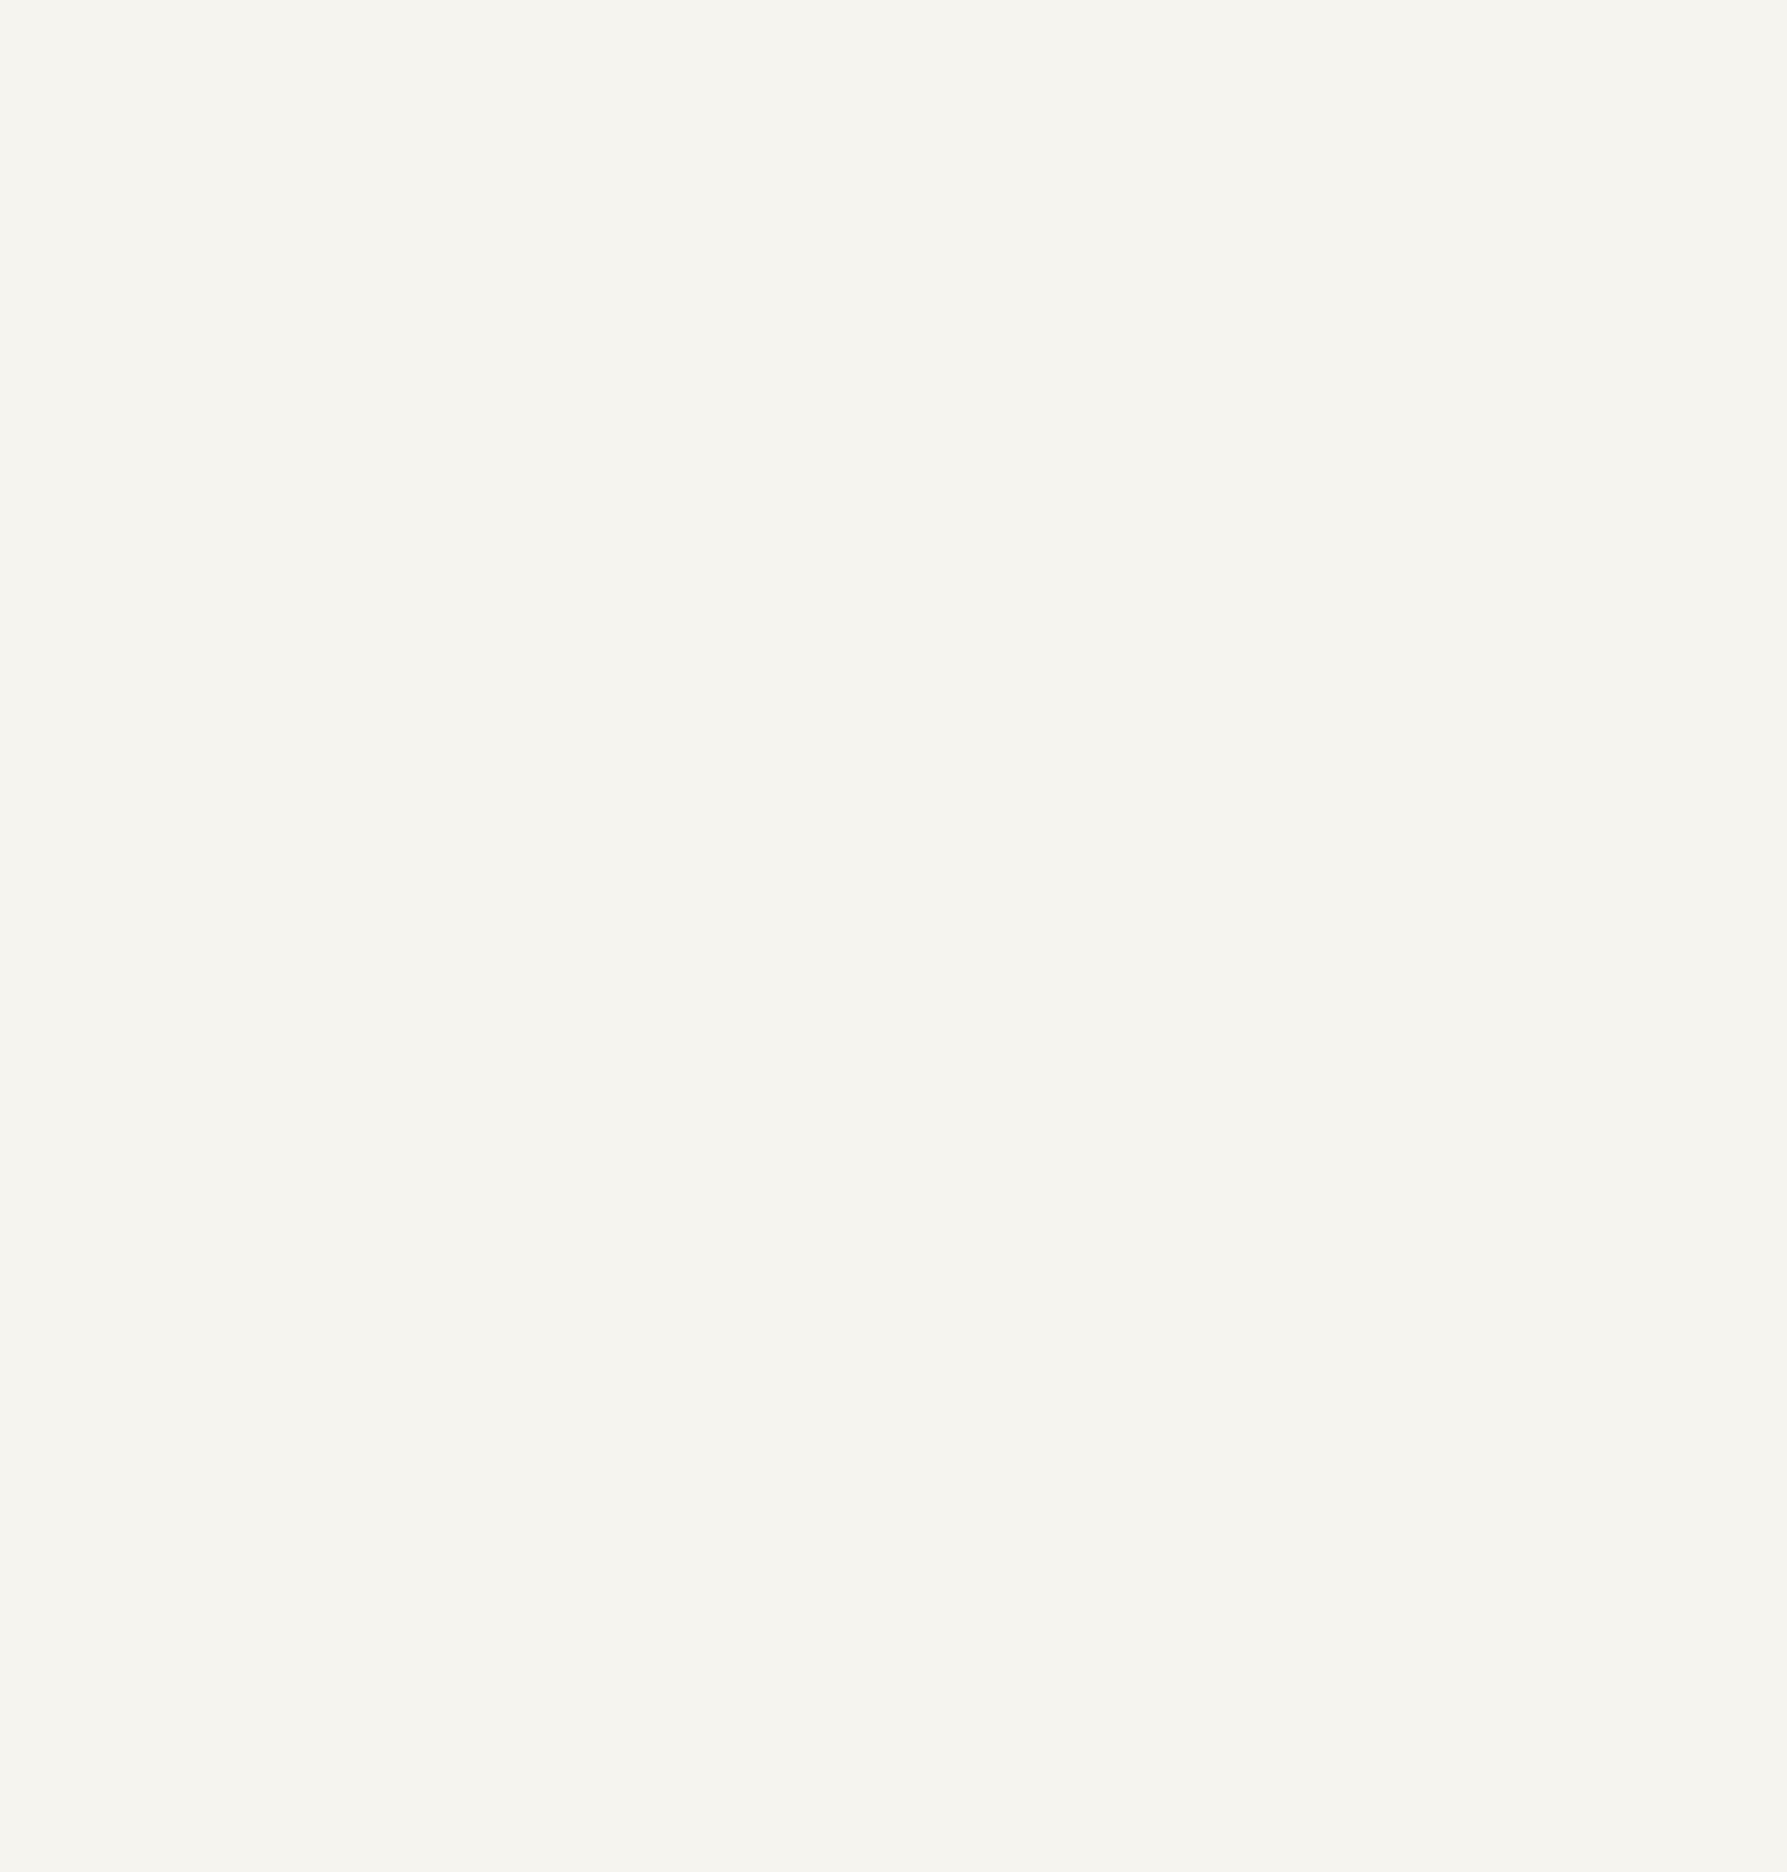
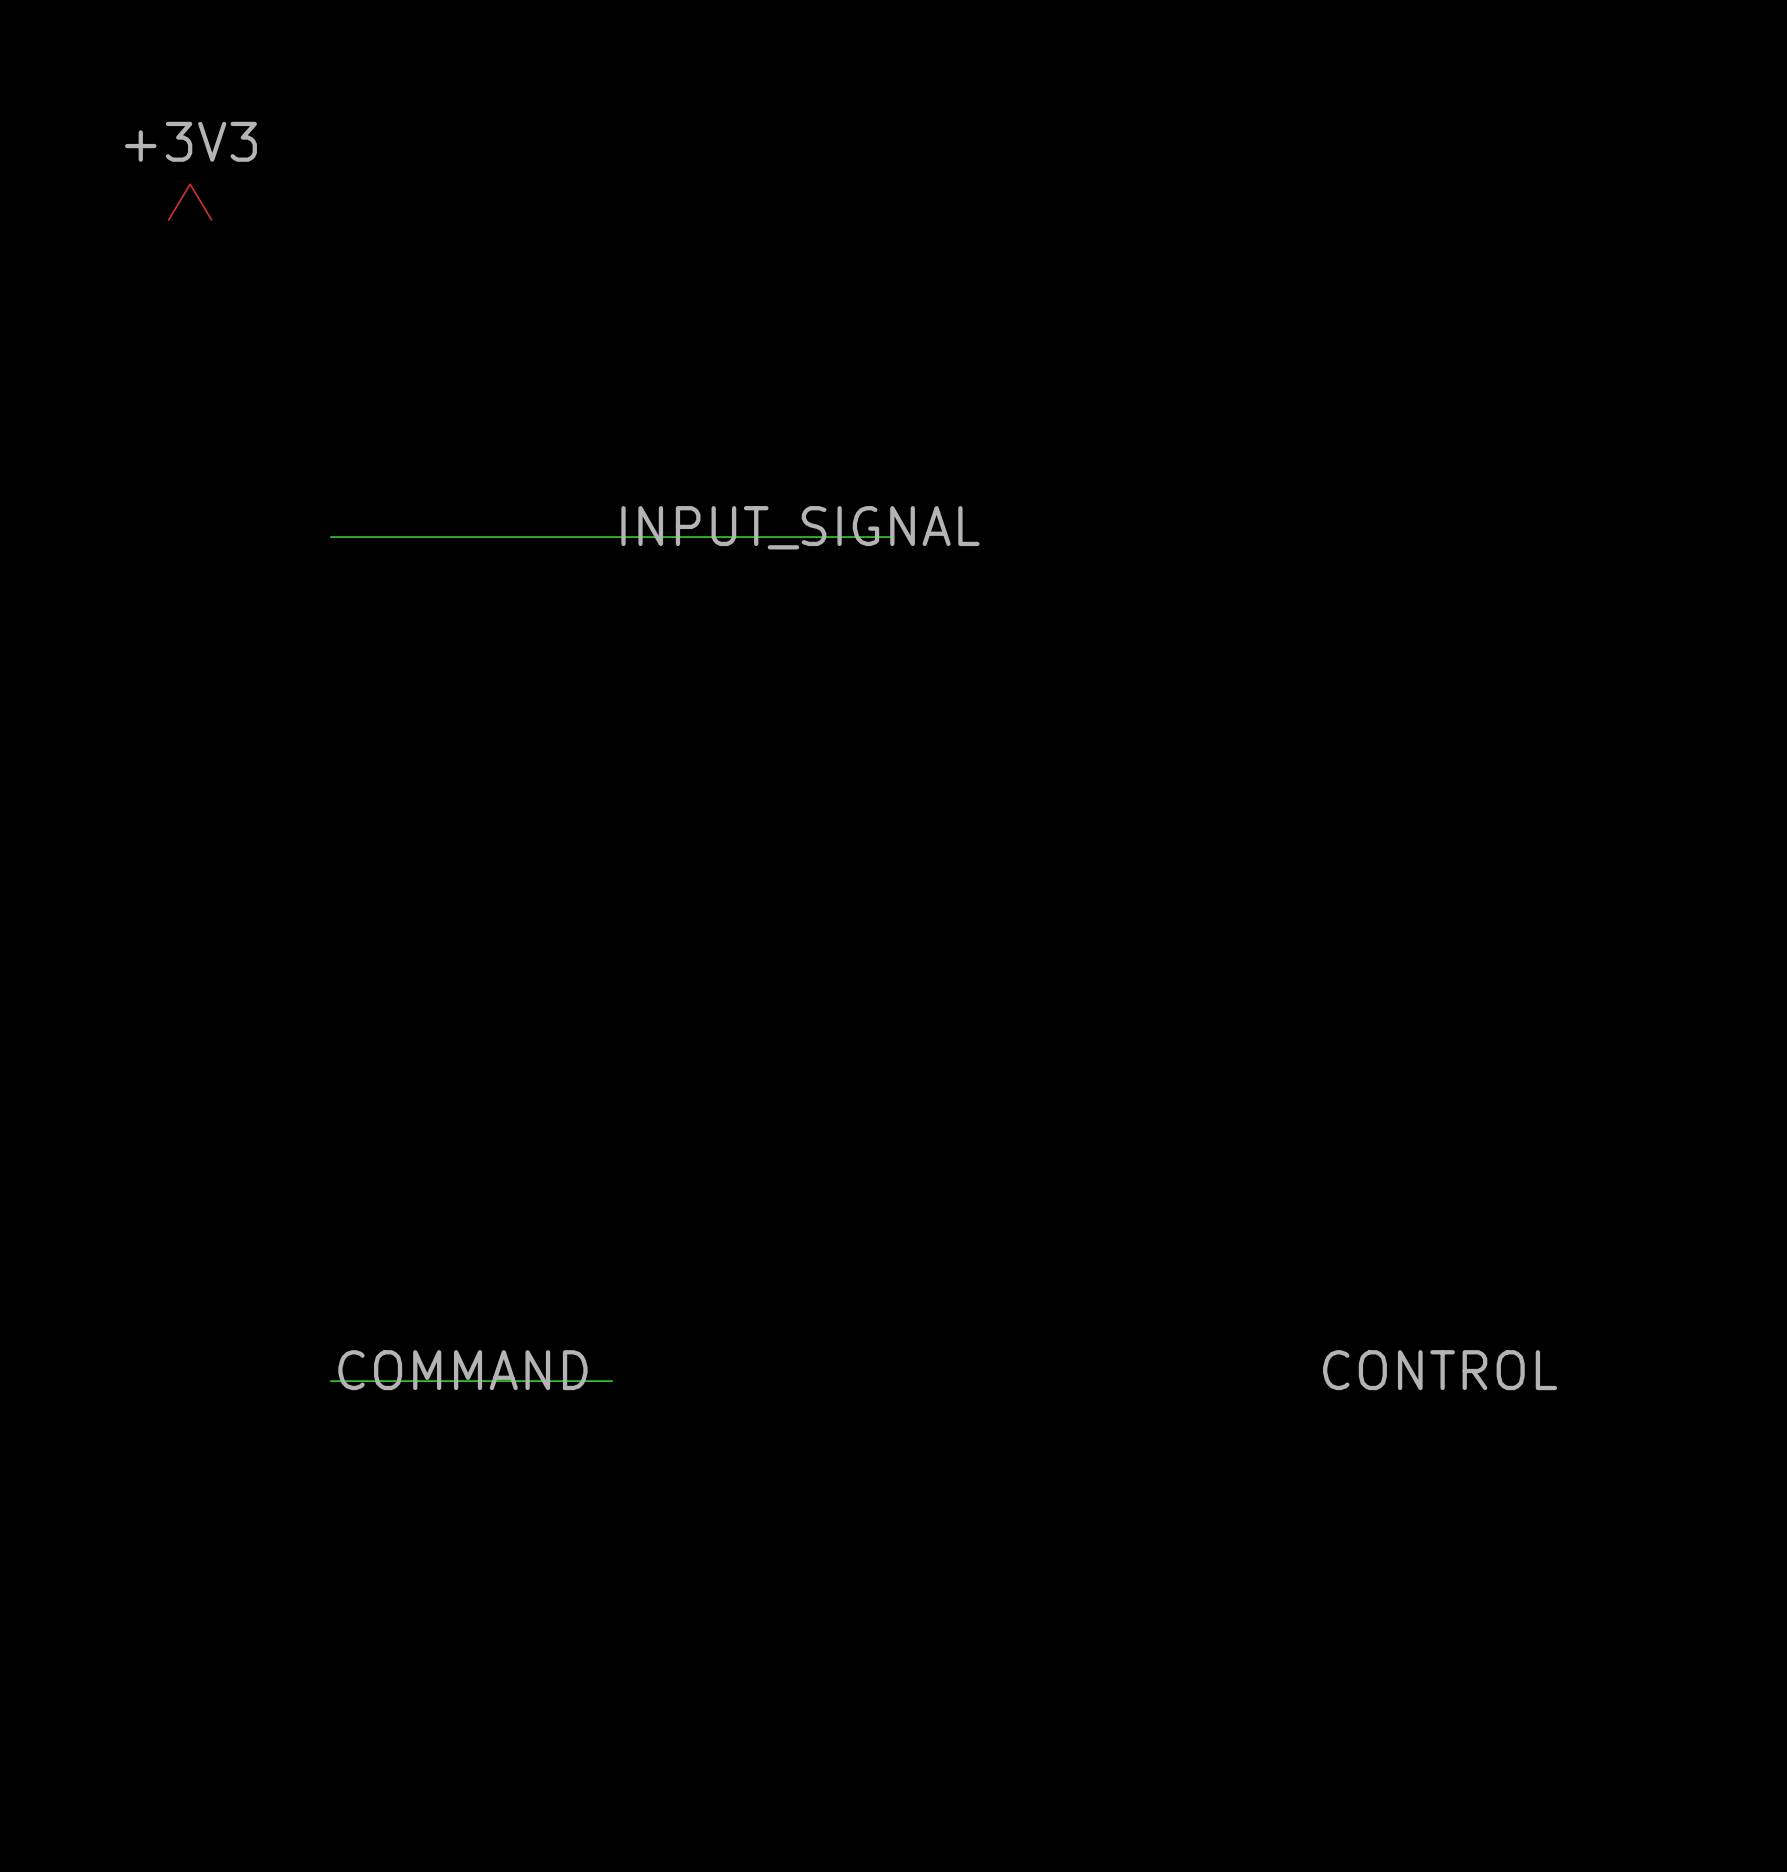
power symbol: none -> +3V3 (190, 202)
label: none -> INPUT_SIGNAL (800, 527)
wire: none -> (330, 537) (893, 537)
label: none -> COMMAND (462, 1370)
label: none -> CONTROL (1440, 1370)
wire: none -> (330, 1381) (612, 1381)

